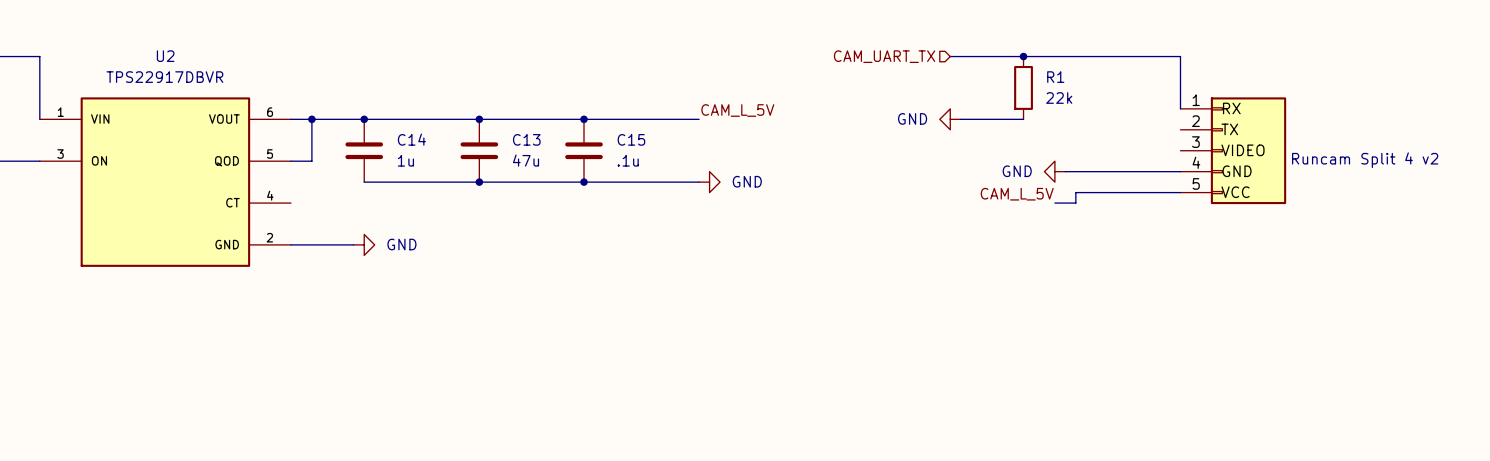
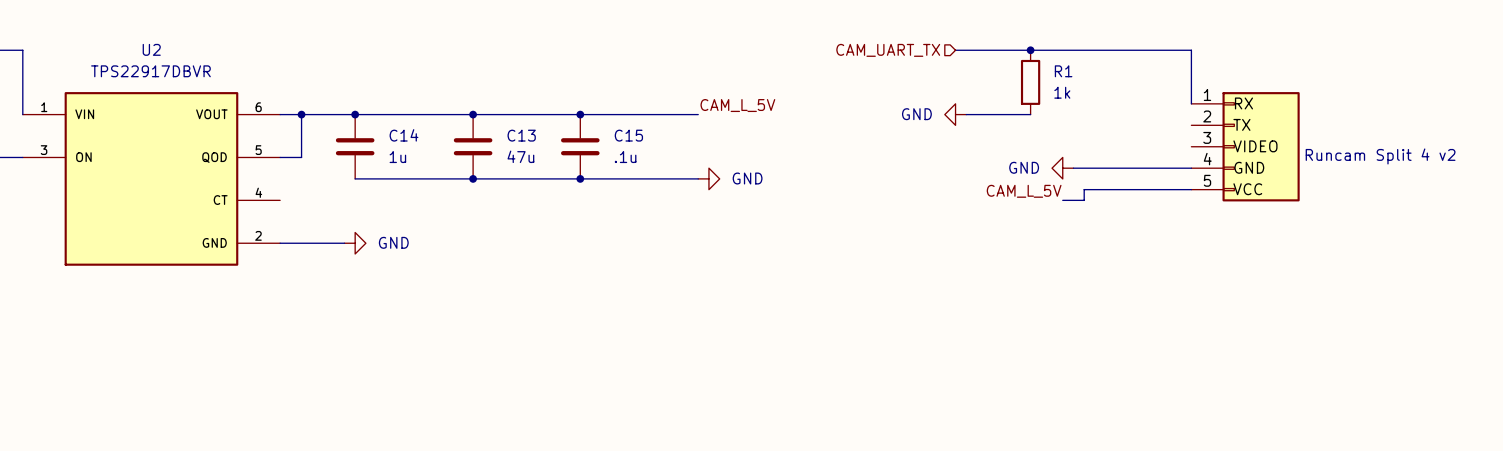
R1 value: 22k (1059, 98) -> 1k (1062, 92)

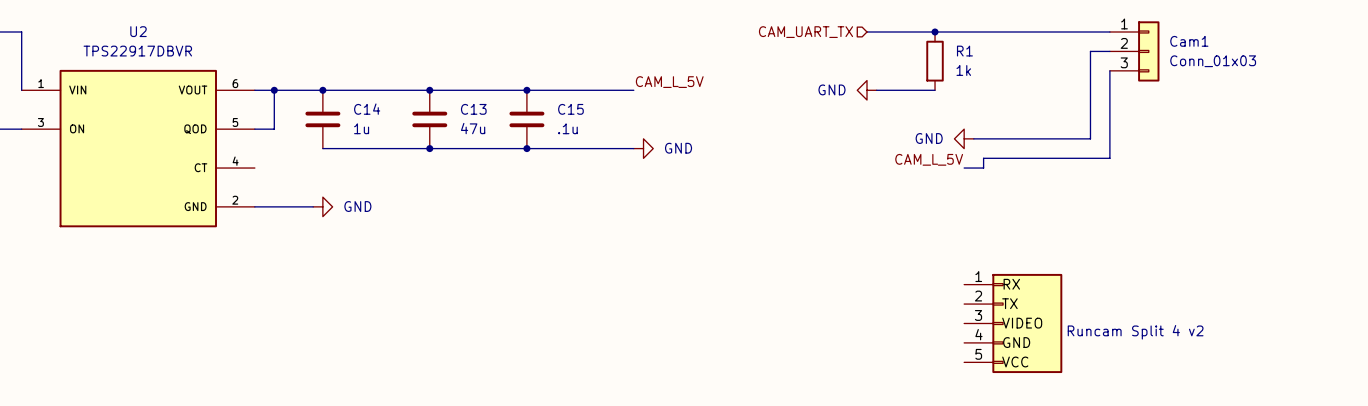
wire: (1191, 50) (1191, 103) -> (1080, 31) (1109, 31)
wire: none -> (1109, 51) (1090, 51) (1090, 138) (1080, 138)
Cam1: none -> Conn_01x03 (1134, 51)
part: Runcam Split 4 v2 (1245, 146) -> none
part: none -> Runcam Split 4 v2 (1013, 323)

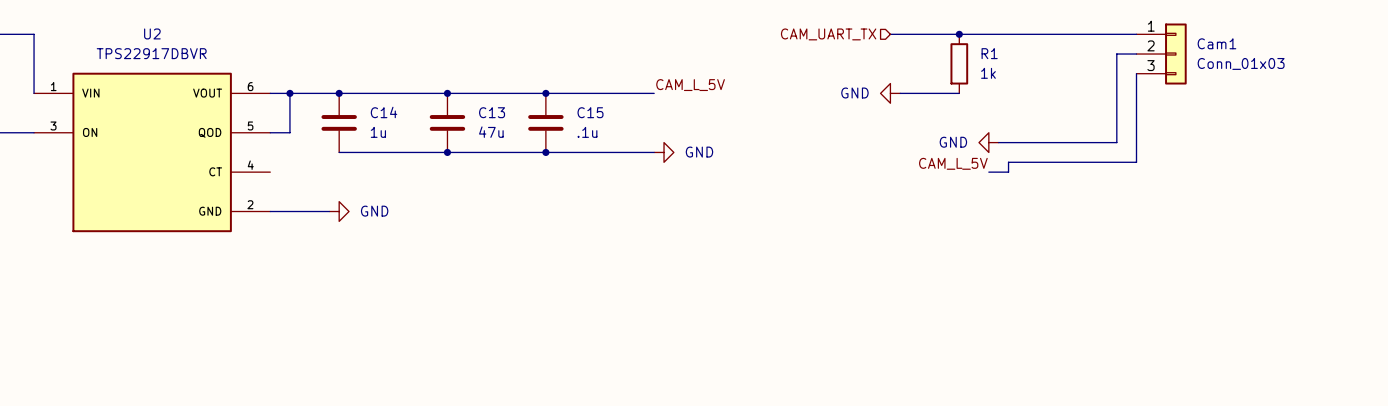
part: Runcam Split 4 v2 (1013, 323) -> none

